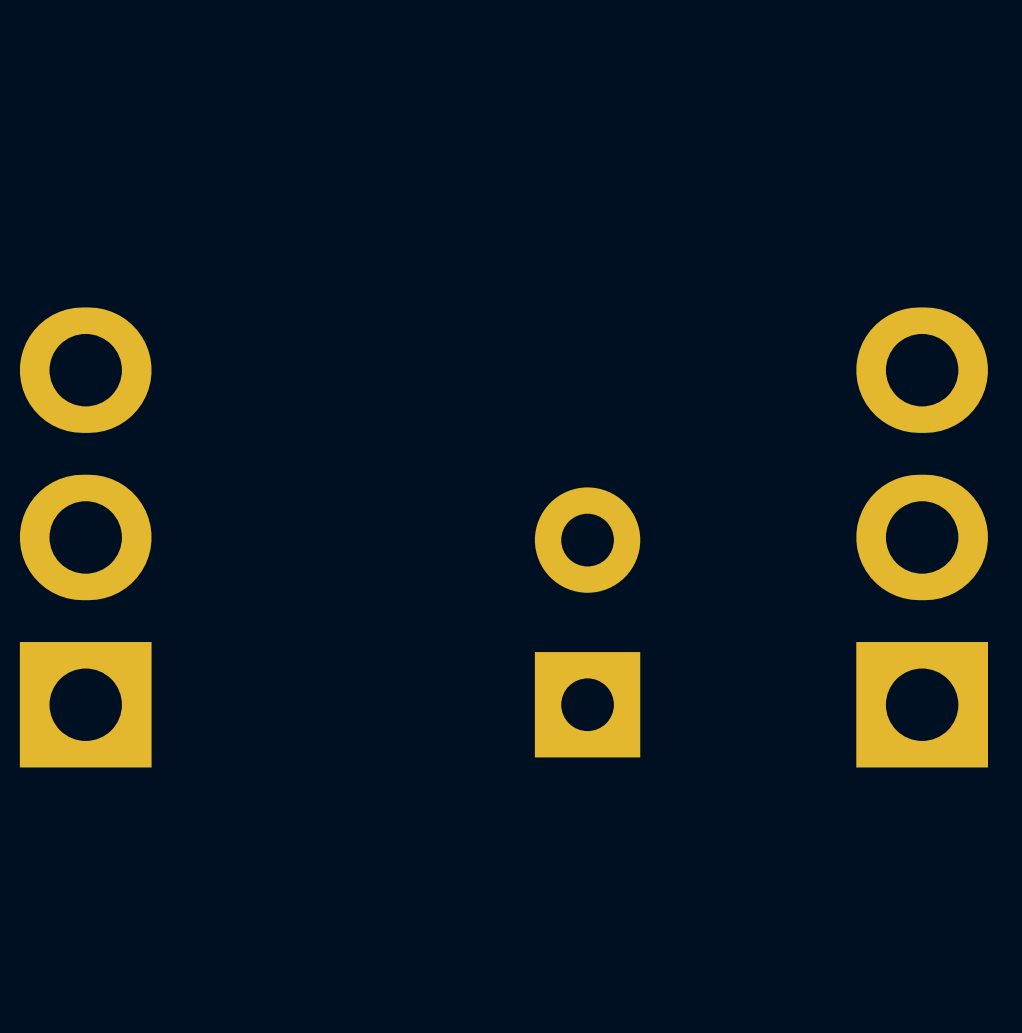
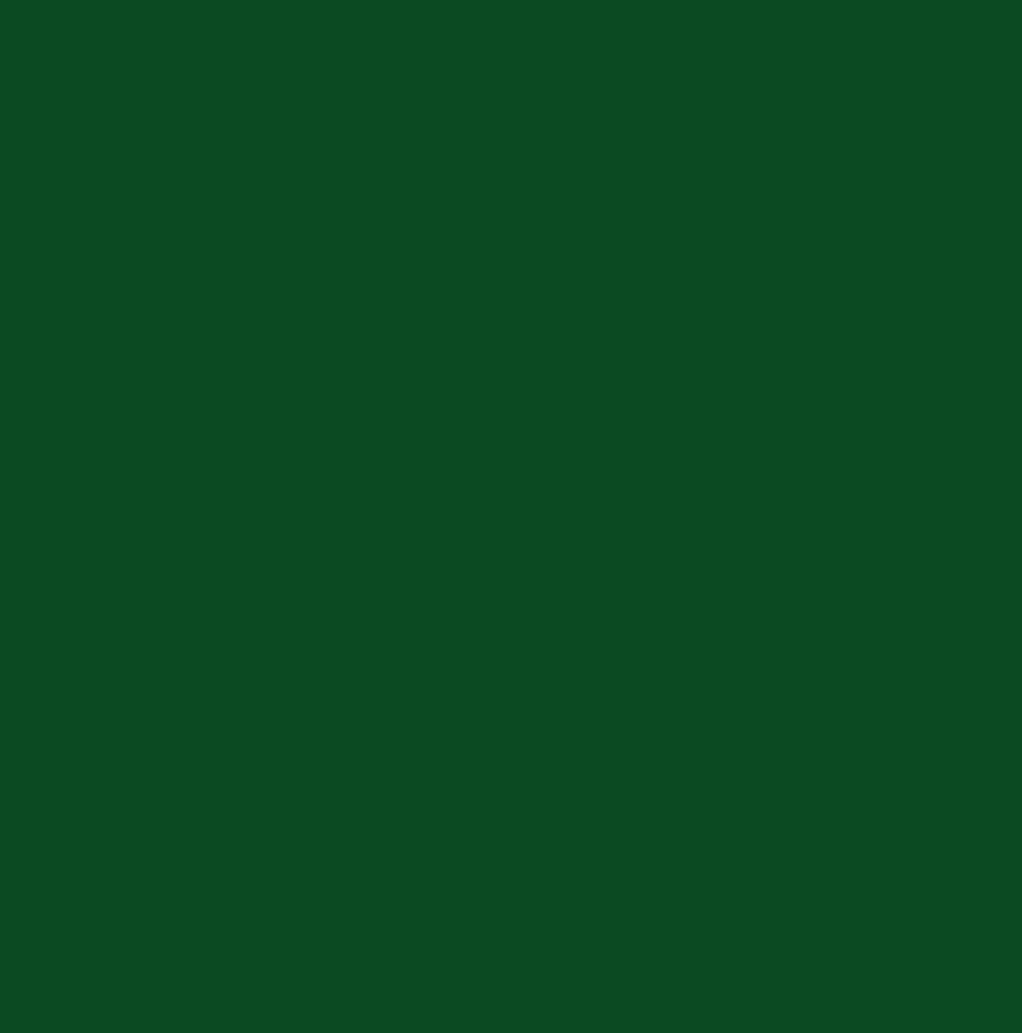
part: (85, 537) -> none
part: (922, 537) -> none
part: (587, 622) -> none

